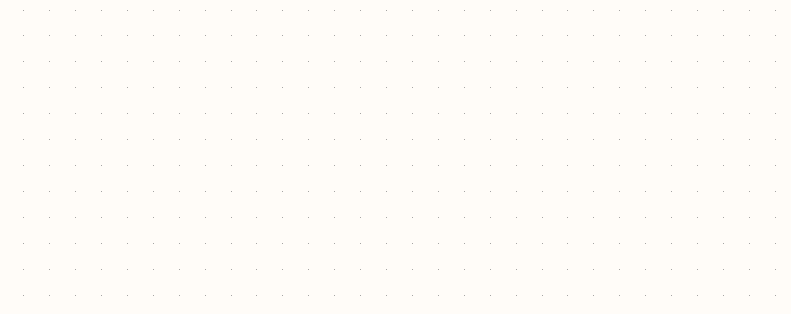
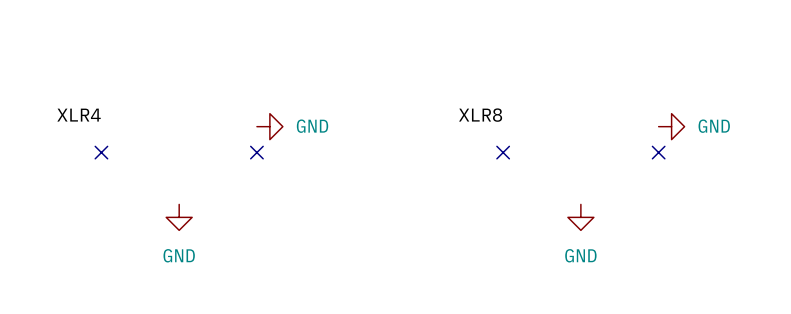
label: none -> XLR4 (79, 115)
label: none -> XLR8 (480, 115)
power symbol: none -> GND (269, 126)
power symbol: none -> GND (671, 126)
no-connect mark: none -> (101, 152)
no-connect mark: none -> (256, 152)
no-connect mark: none -> (503, 152)
no-connect mark: none -> (658, 152)
power symbol: none -> GND (179, 217)
power symbol: none -> GND (580, 217)

